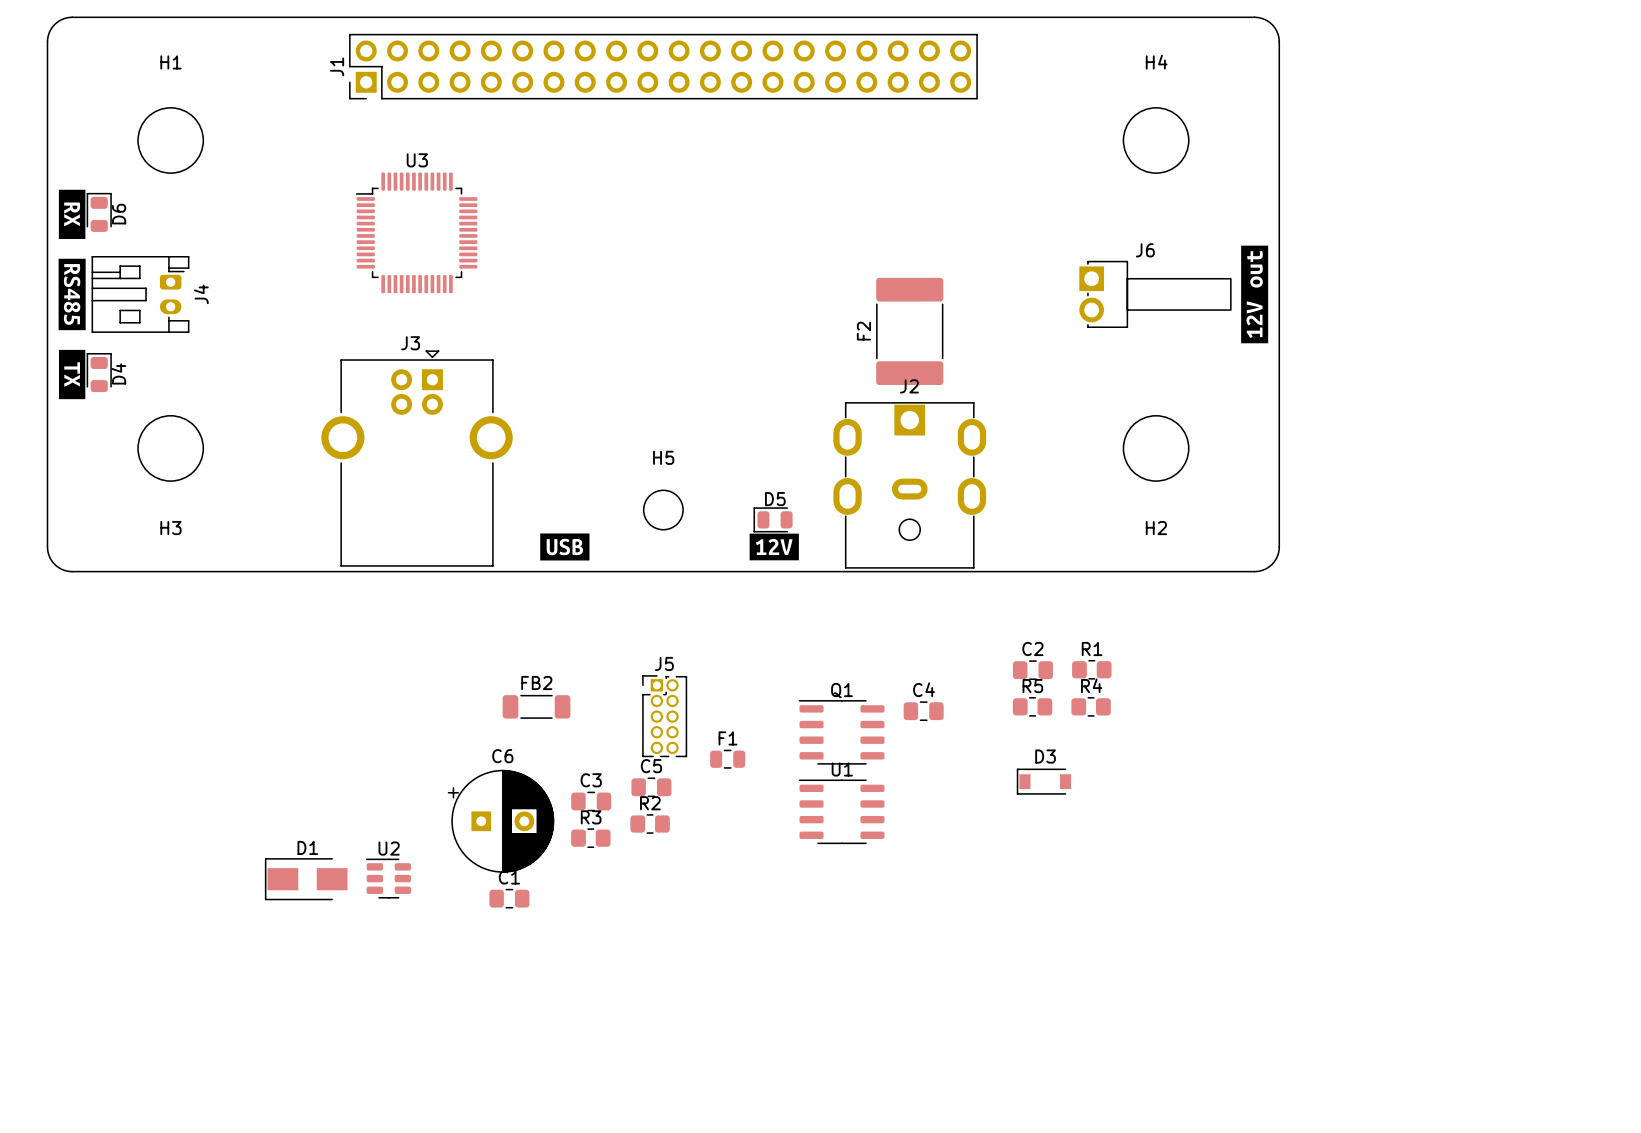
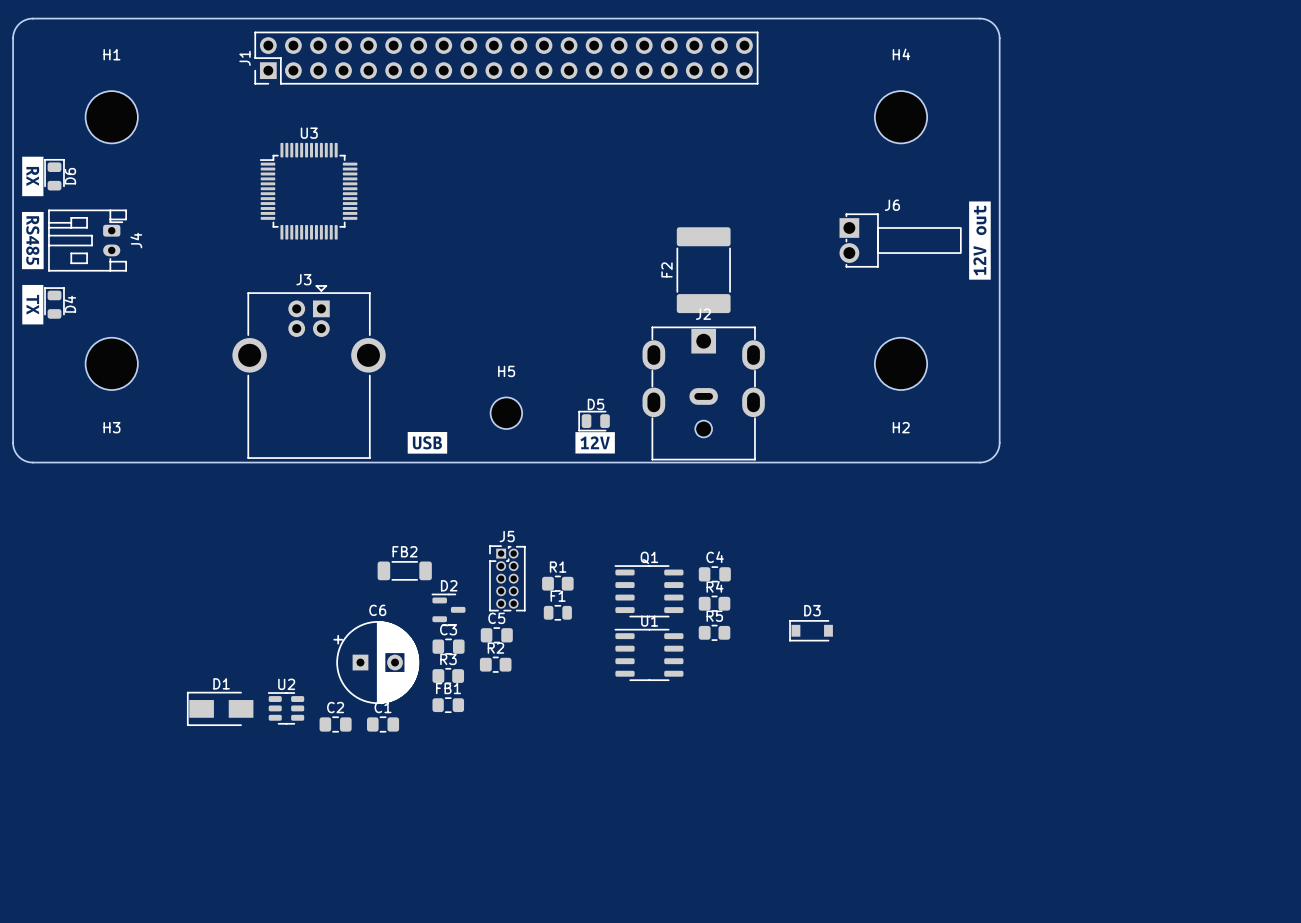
R1 position: (1091, 669) -> (557, 583)
C2 position: (1032, 670) -> (335, 724)
R5 position: (1032, 706) -> (714, 632)
R4 position: (1091, 706) -> (714, 603)
D2: none -> (448, 609)
FB1: none -> (448, 705)

